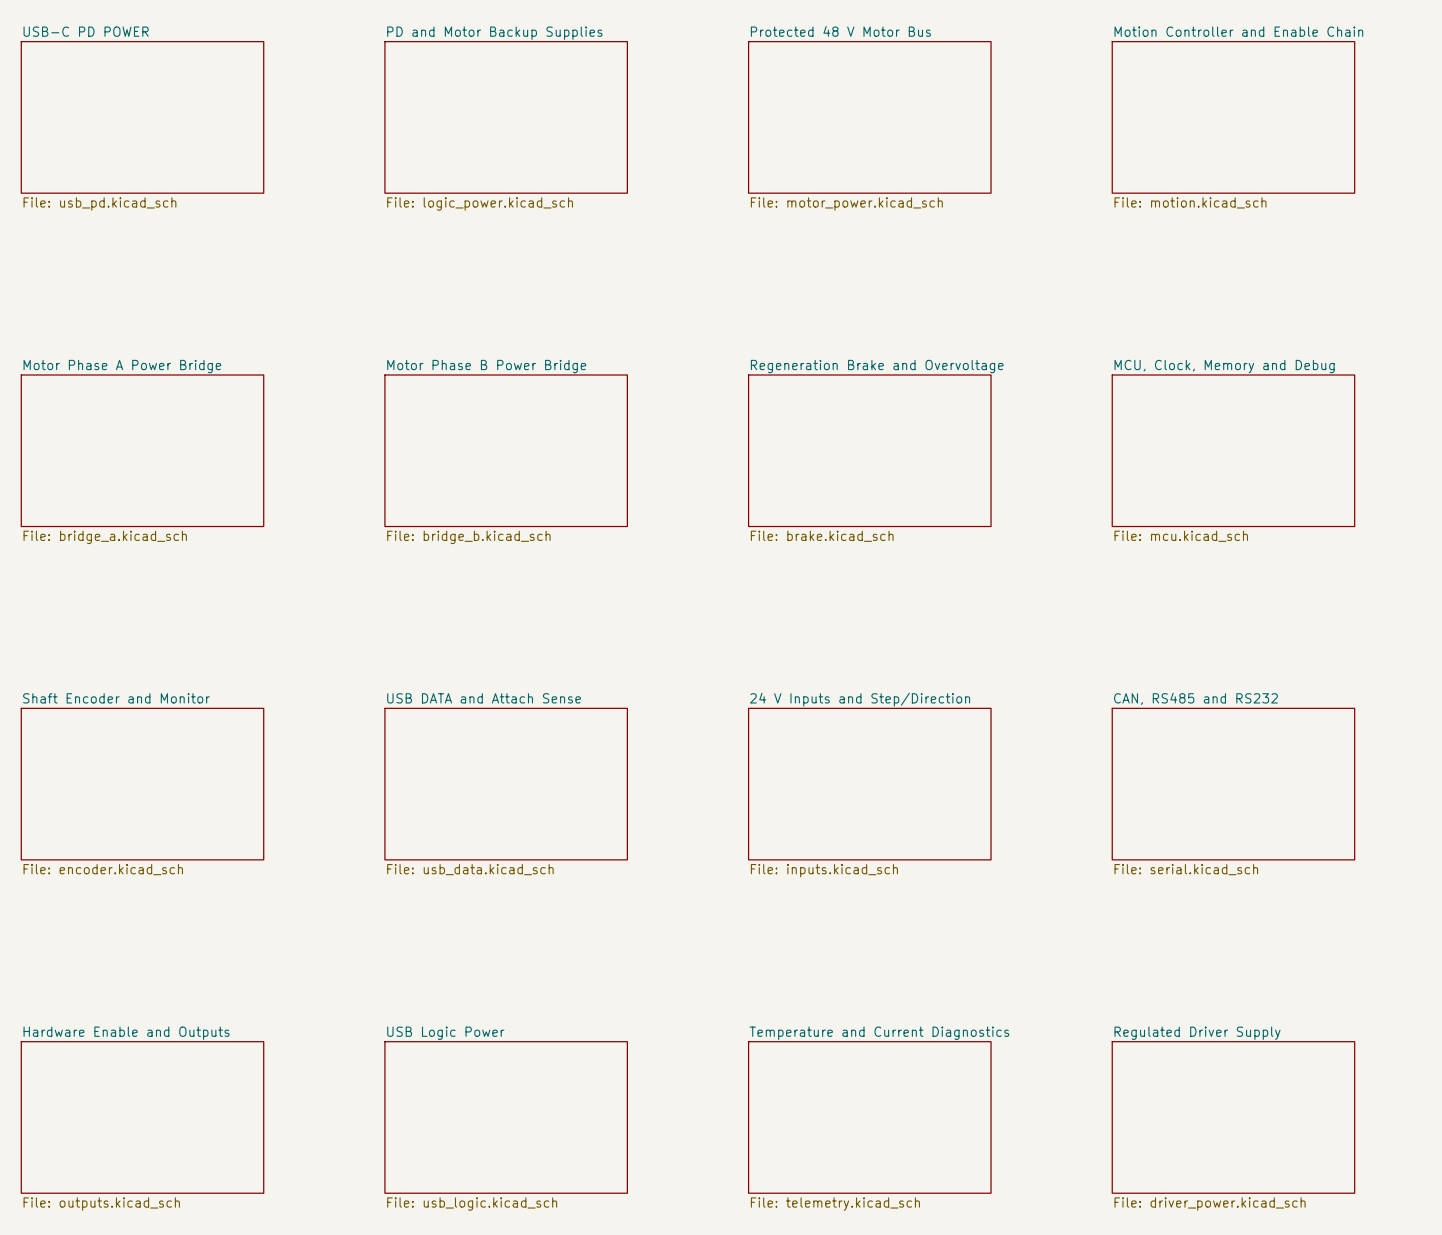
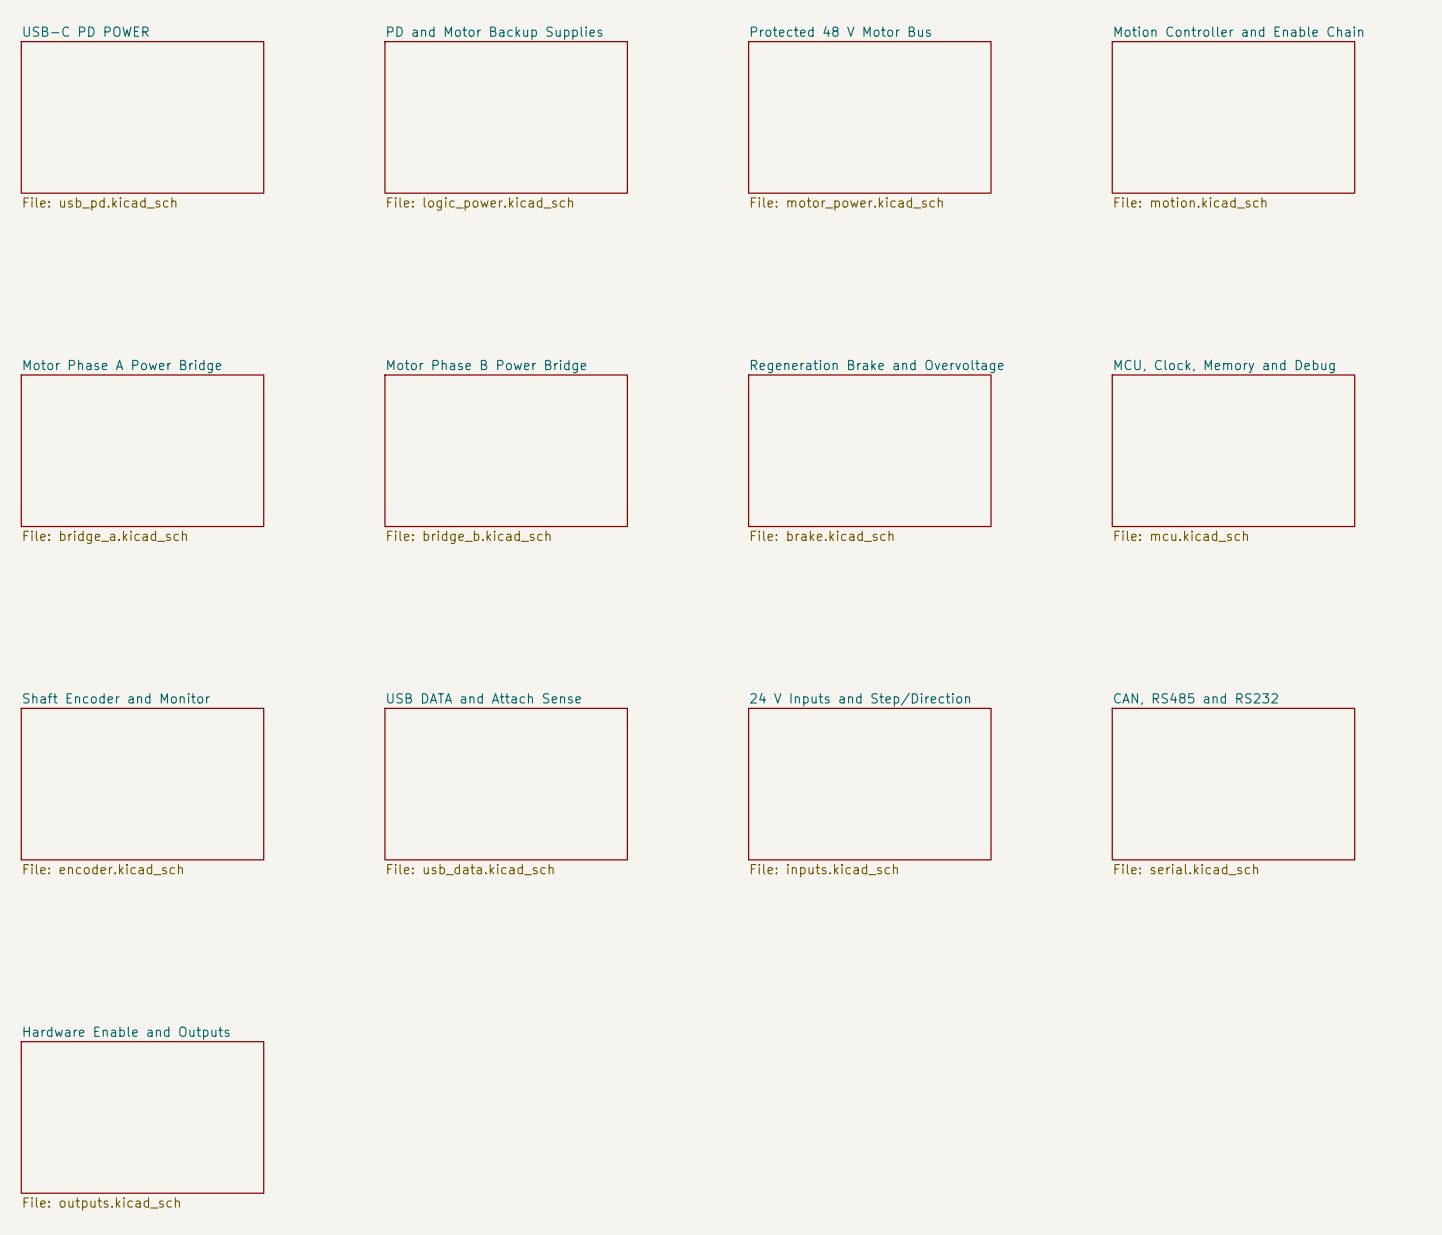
sheet USB Logic Power: File: usb_logic.kicad_sch (506, 1117) -> none
sheet Temperature and Current Diagnostics: File: telemetry.kicad_sch (869, 1117) -> none
sheet Regulated Driver Supply: File: driver_power.kicad_sch (1233, 1117) -> none

